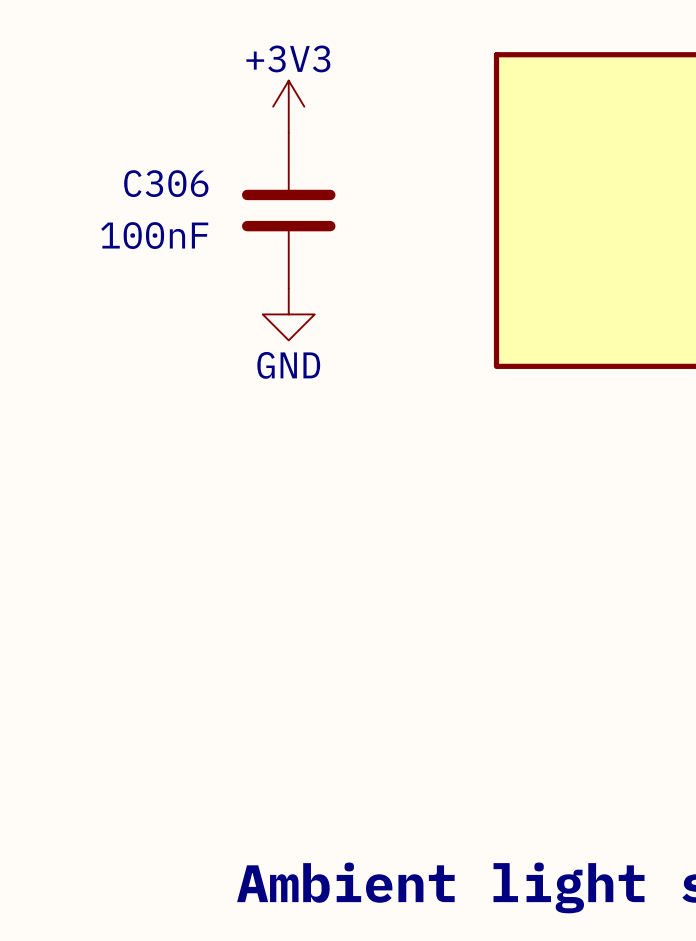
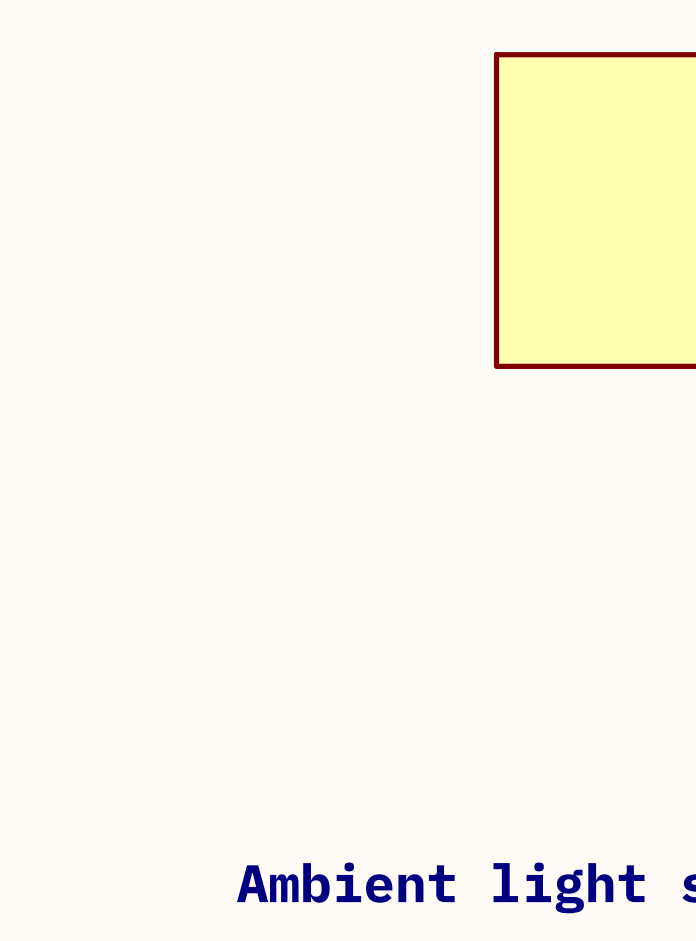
power symbol: +3V3 (288, 106) -> none
C306: 100nF (288, 210) -> none
power symbol: GND (288, 314) -> none

